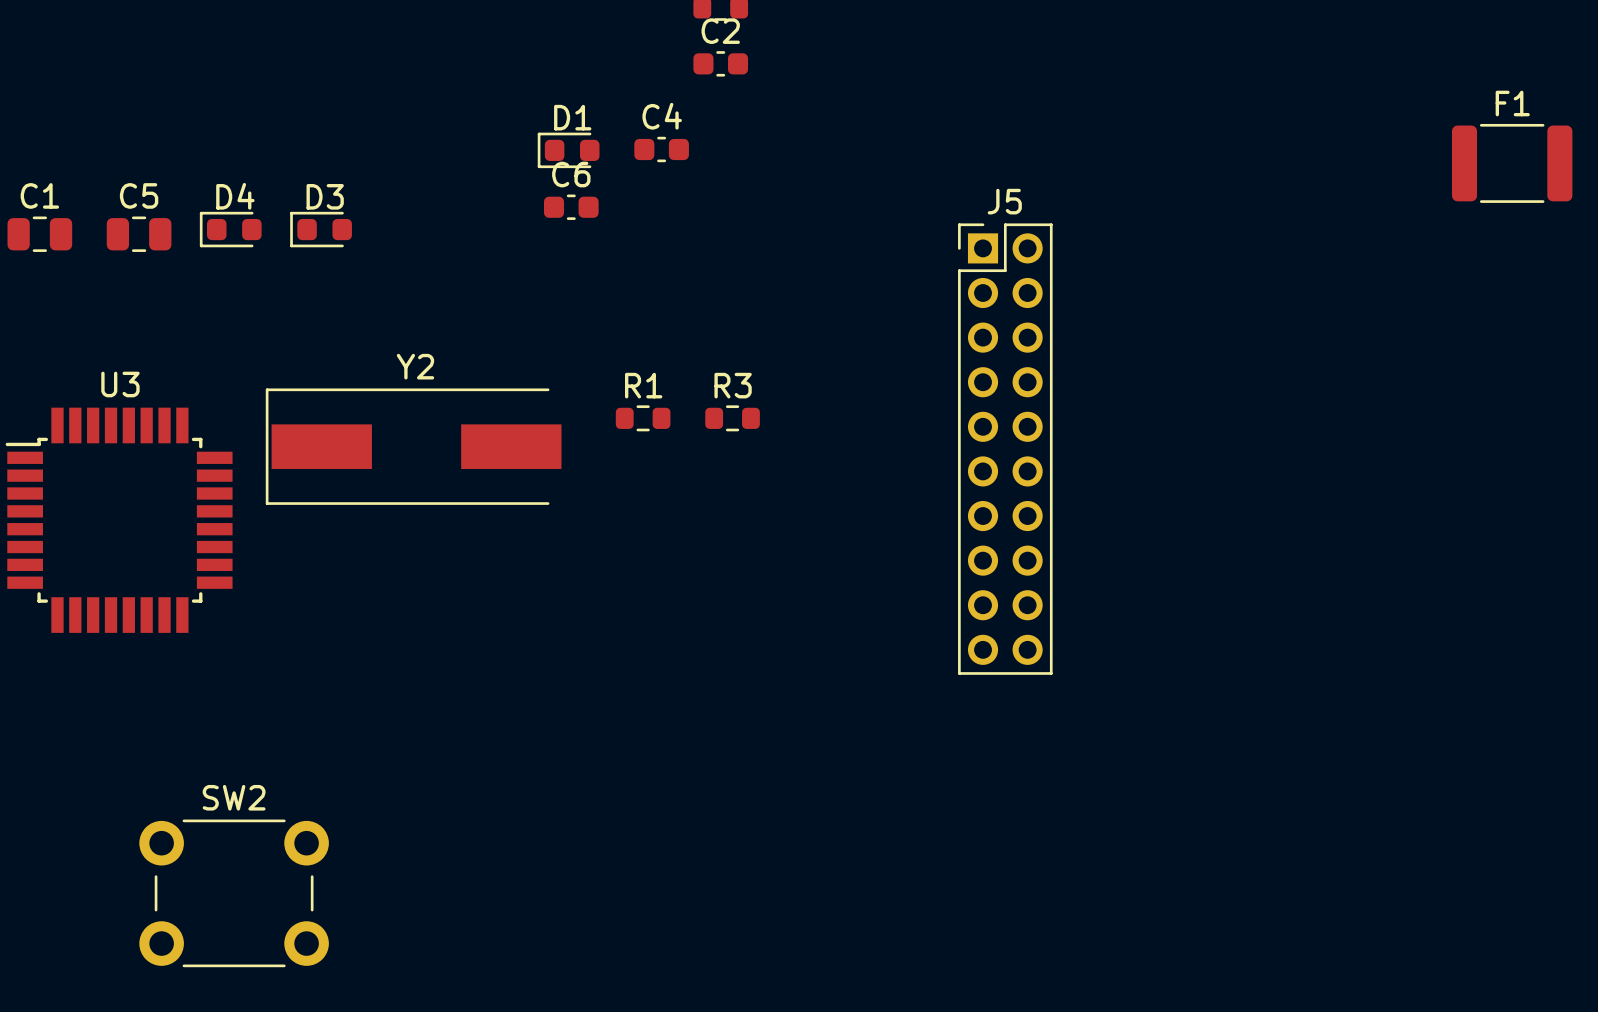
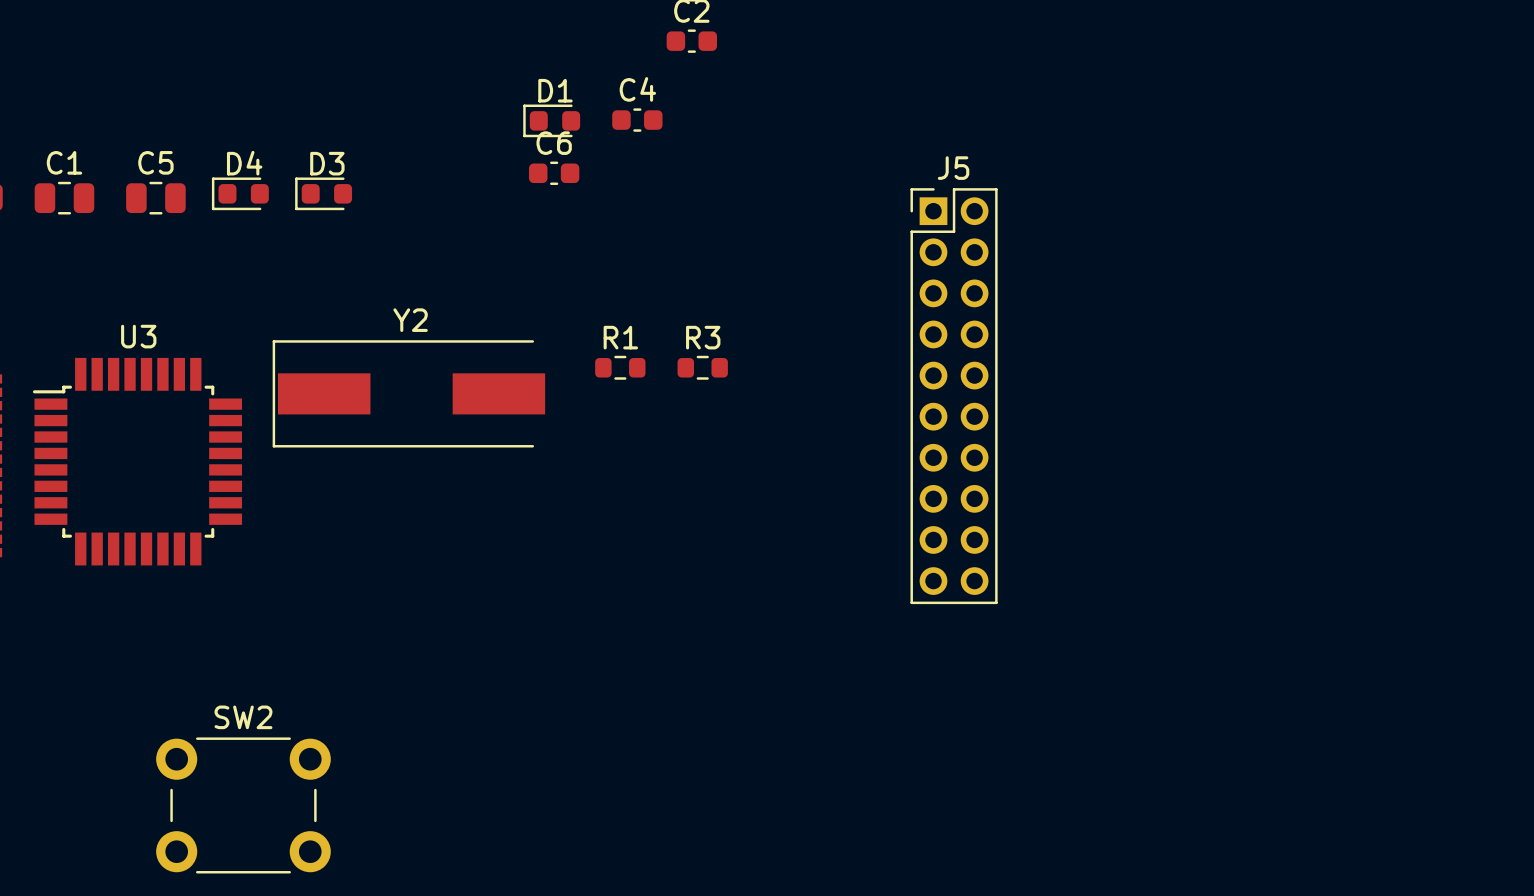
F1: (1512, 163) -> none

